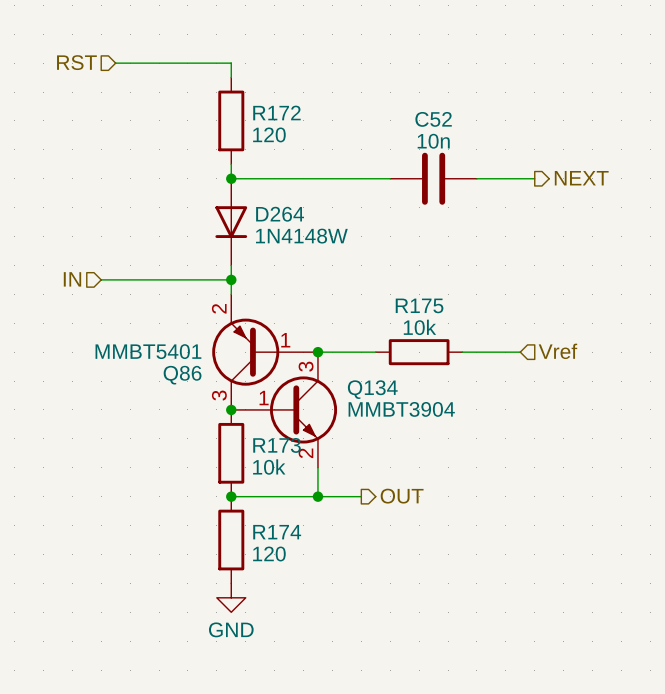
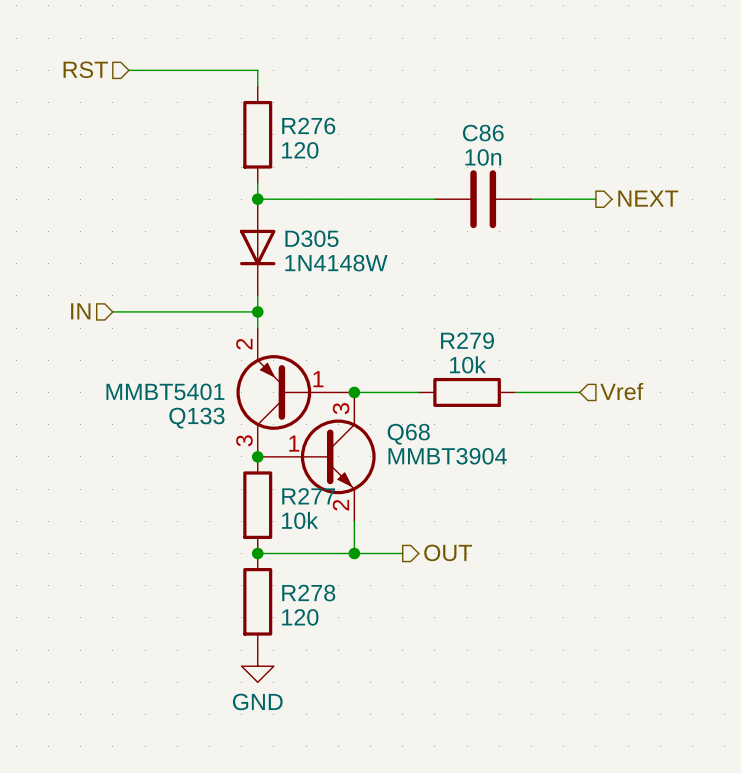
R172 name: R172 (276, 112) -> R276 (308, 126)
C52 name: C52 (433, 119) -> C86 (483, 133)
D264 name: D264 (280, 214) -> D305 (311, 238)
R175 name: R175 (419, 305) -> R279 (467, 340)
Q86 name: Q86 (182, 375) -> Q133 (196, 418)
Q134 name: Q134 (372, 389) -> Q68 (408, 434)
R173 name: R173 (277, 445) -> R277 (308, 496)
R174 name: R174 (277, 532) -> R278 (308, 593)

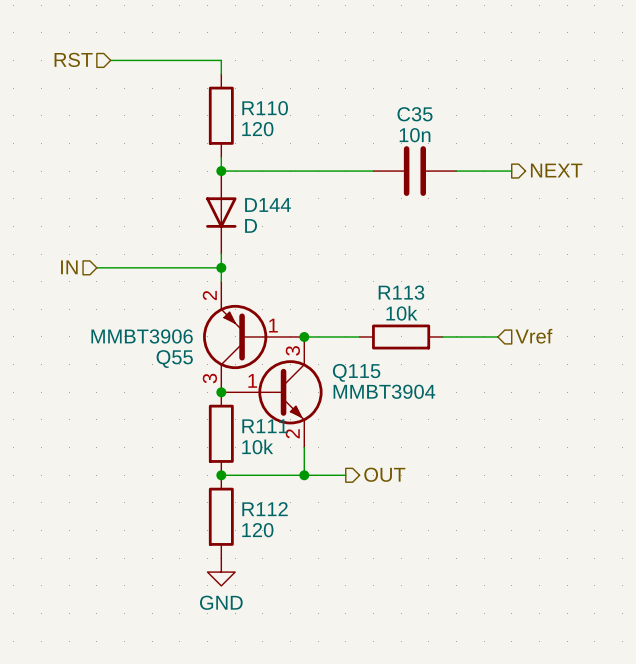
R276 name: R276 (308, 126) -> R110 (265, 108)
C86 name: C86 (483, 133) -> C35 (415, 114)
D305 name: D305 (311, 238) -> D144 (268, 205)
D305 value: 1N4148W (336, 263) -> D (251, 225)
R279 name: R279 (467, 340) -> R113 (401, 292)
Q133 value: MMBT5401 (165, 391) -> MMBT3906 (142, 336)
Q133 name: Q133 (196, 418) -> Q55 (174, 359)
Q68 name: Q68 (408, 434) -> Q115 (356, 372)
R277 name: R277 (308, 496) -> R111 (265, 426)
R278 name: R278 (308, 593) -> R112 (265, 509)

